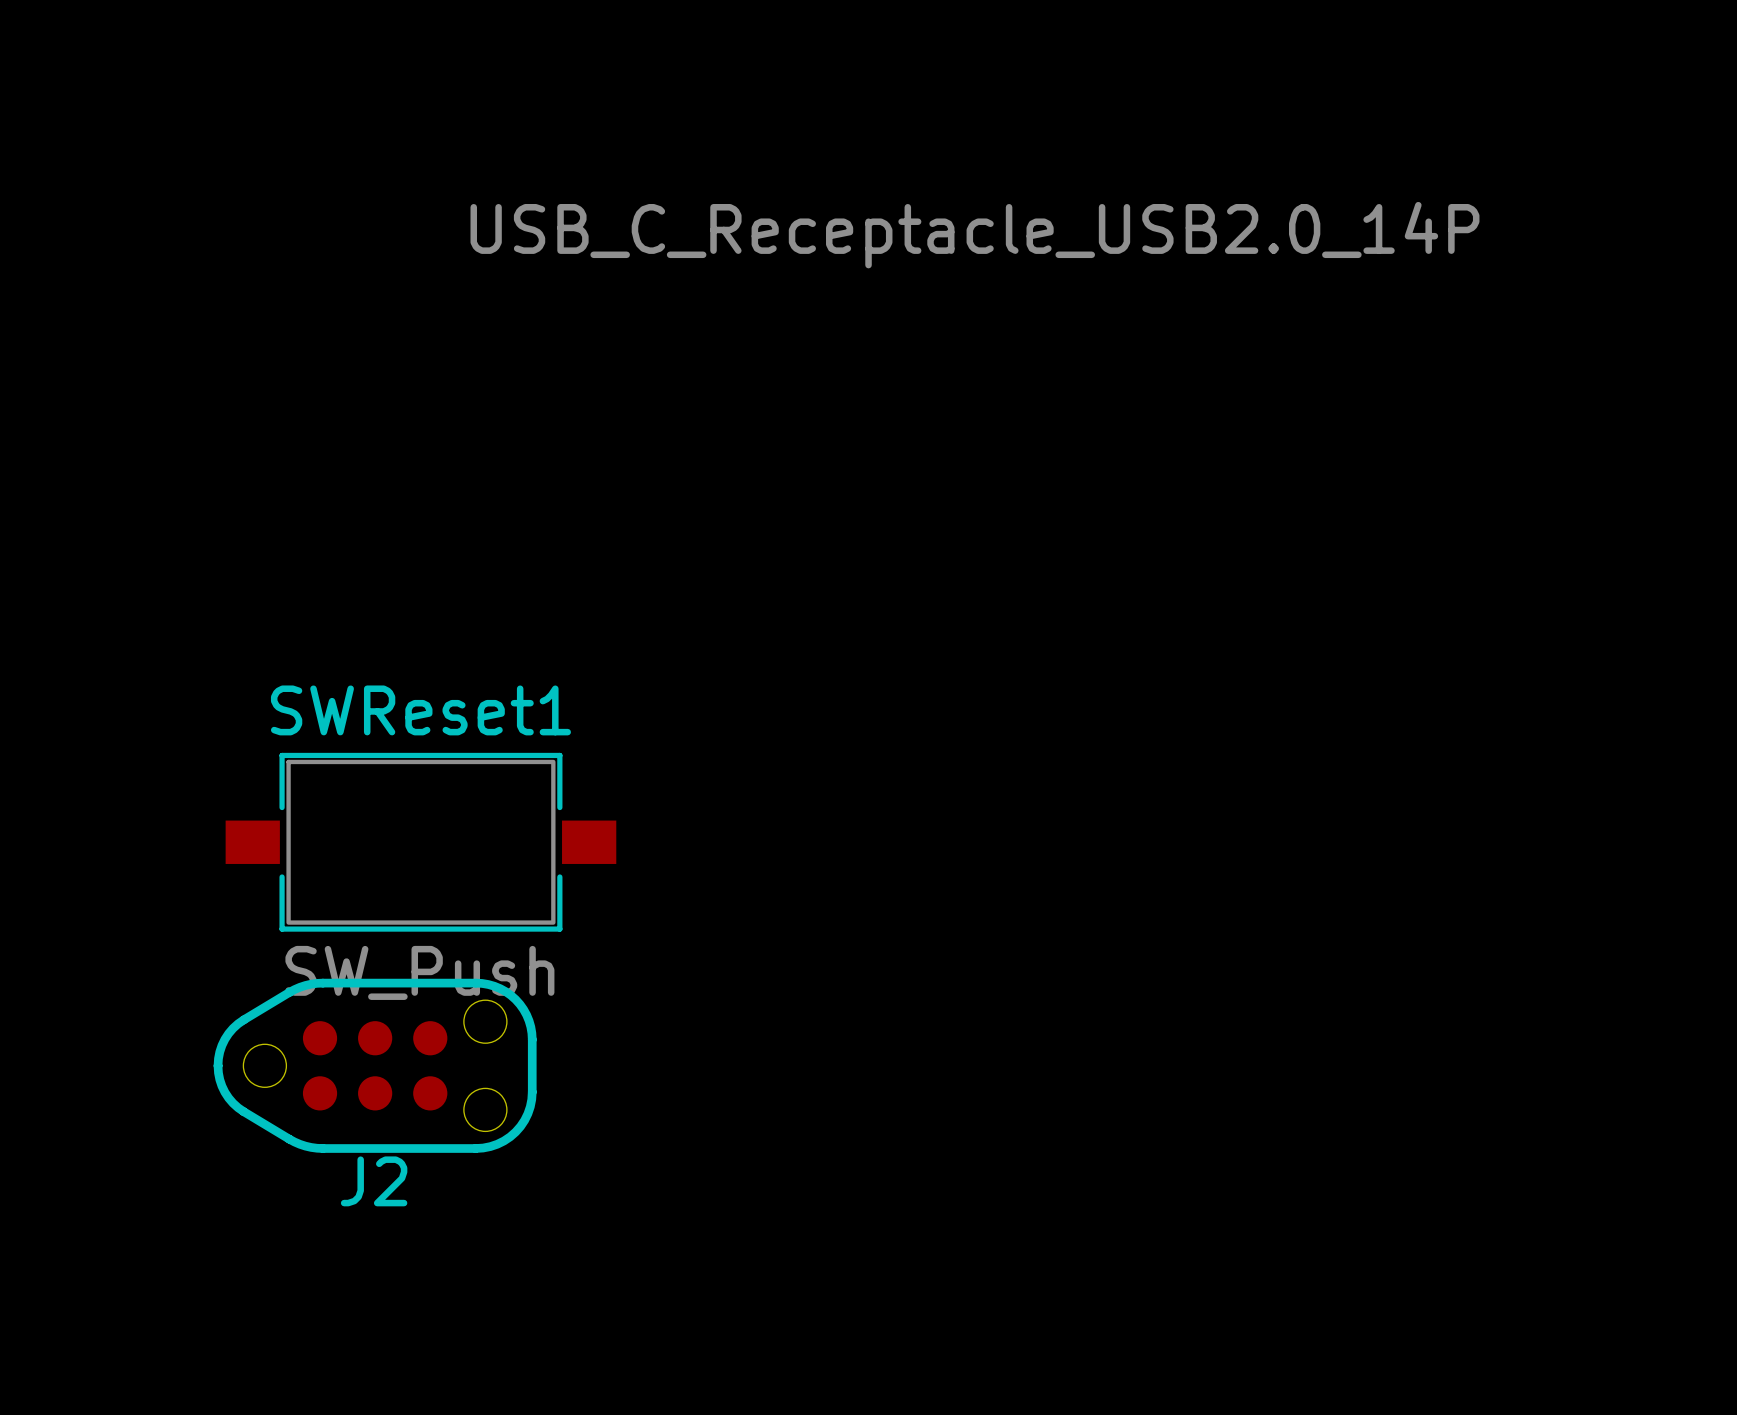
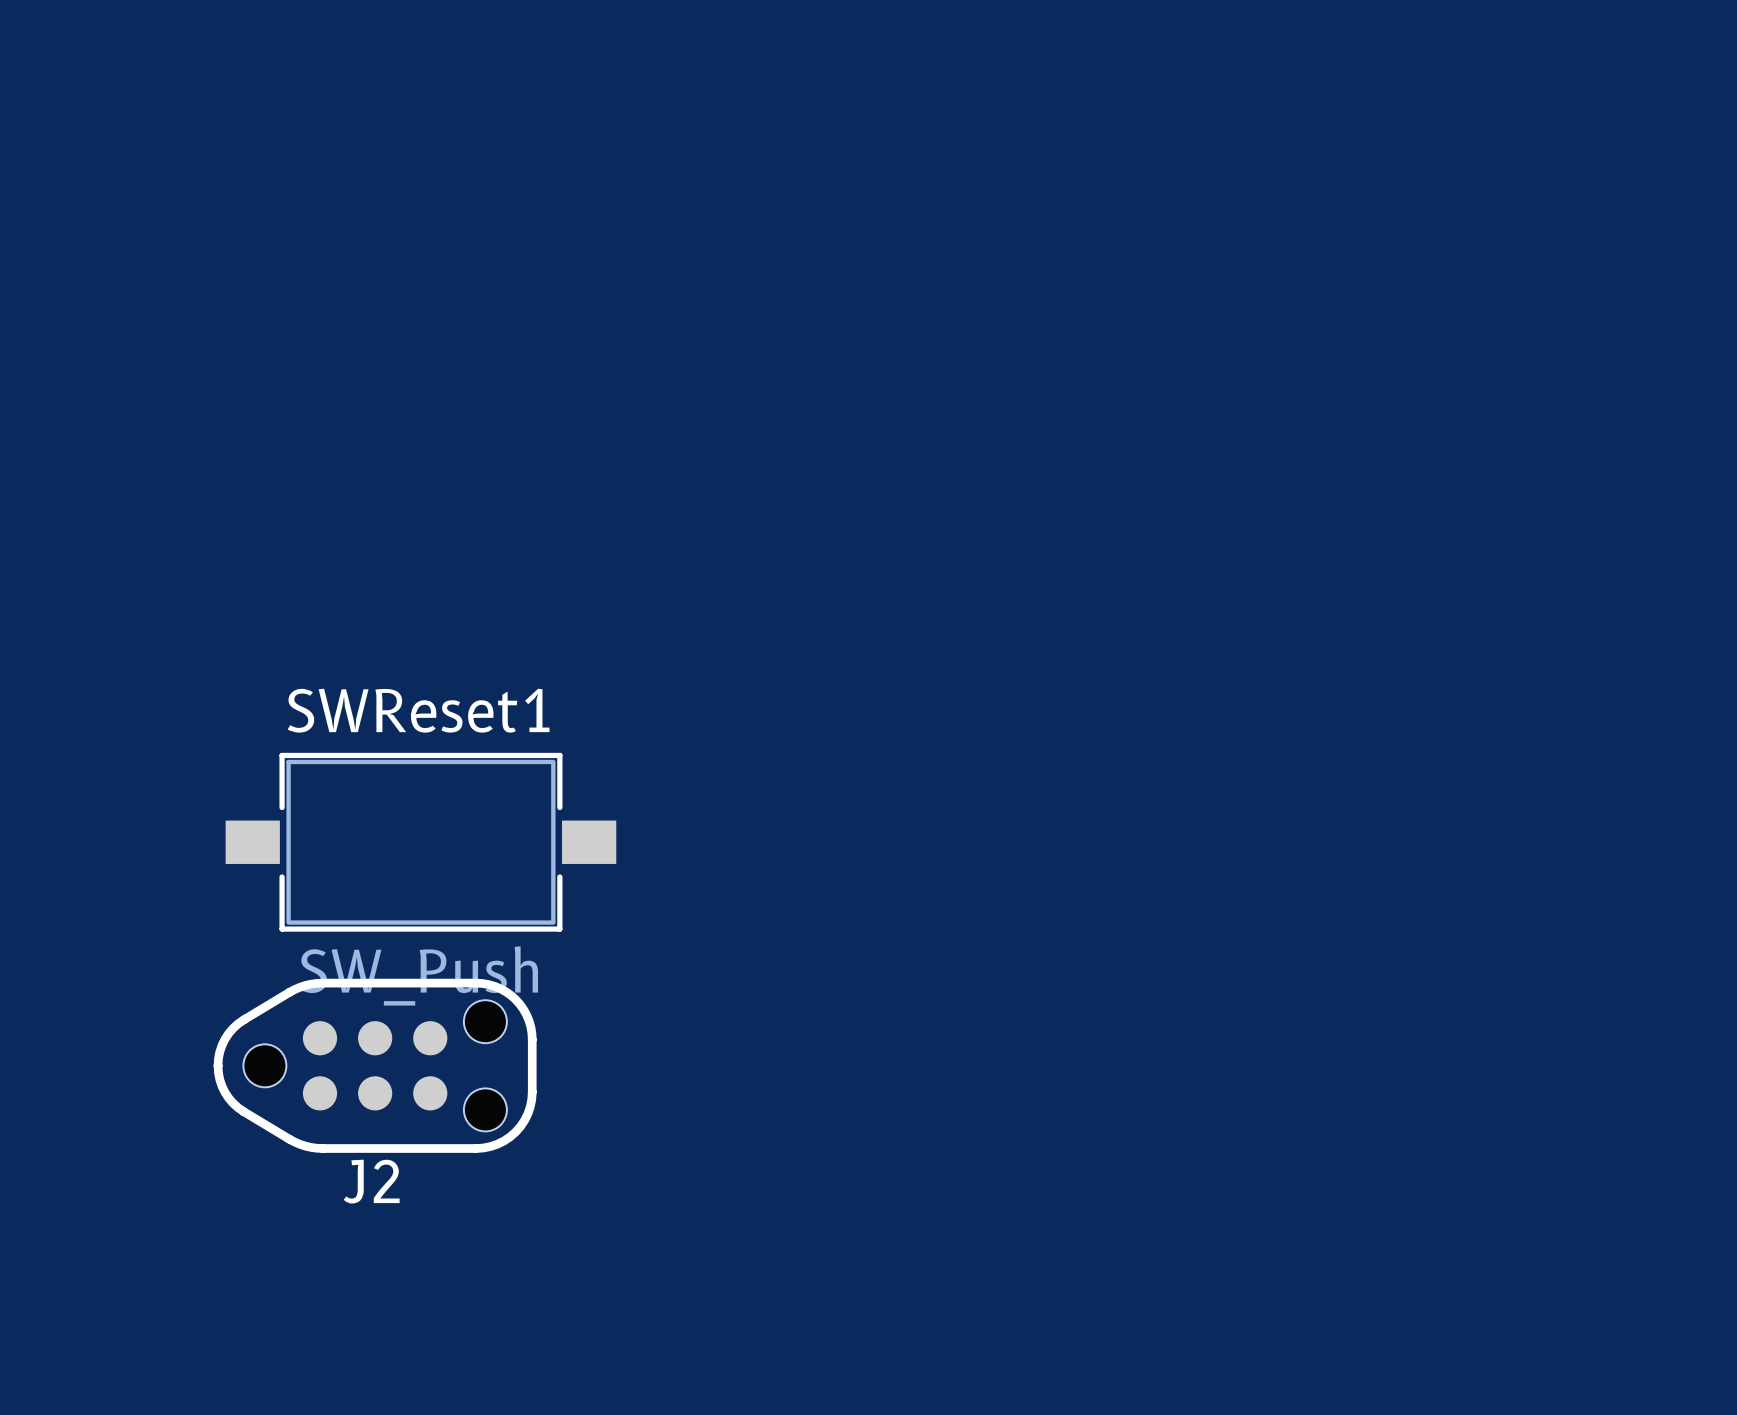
part value: USB_C_Receptacle_USB2.0_14P (974, 235) -> none

